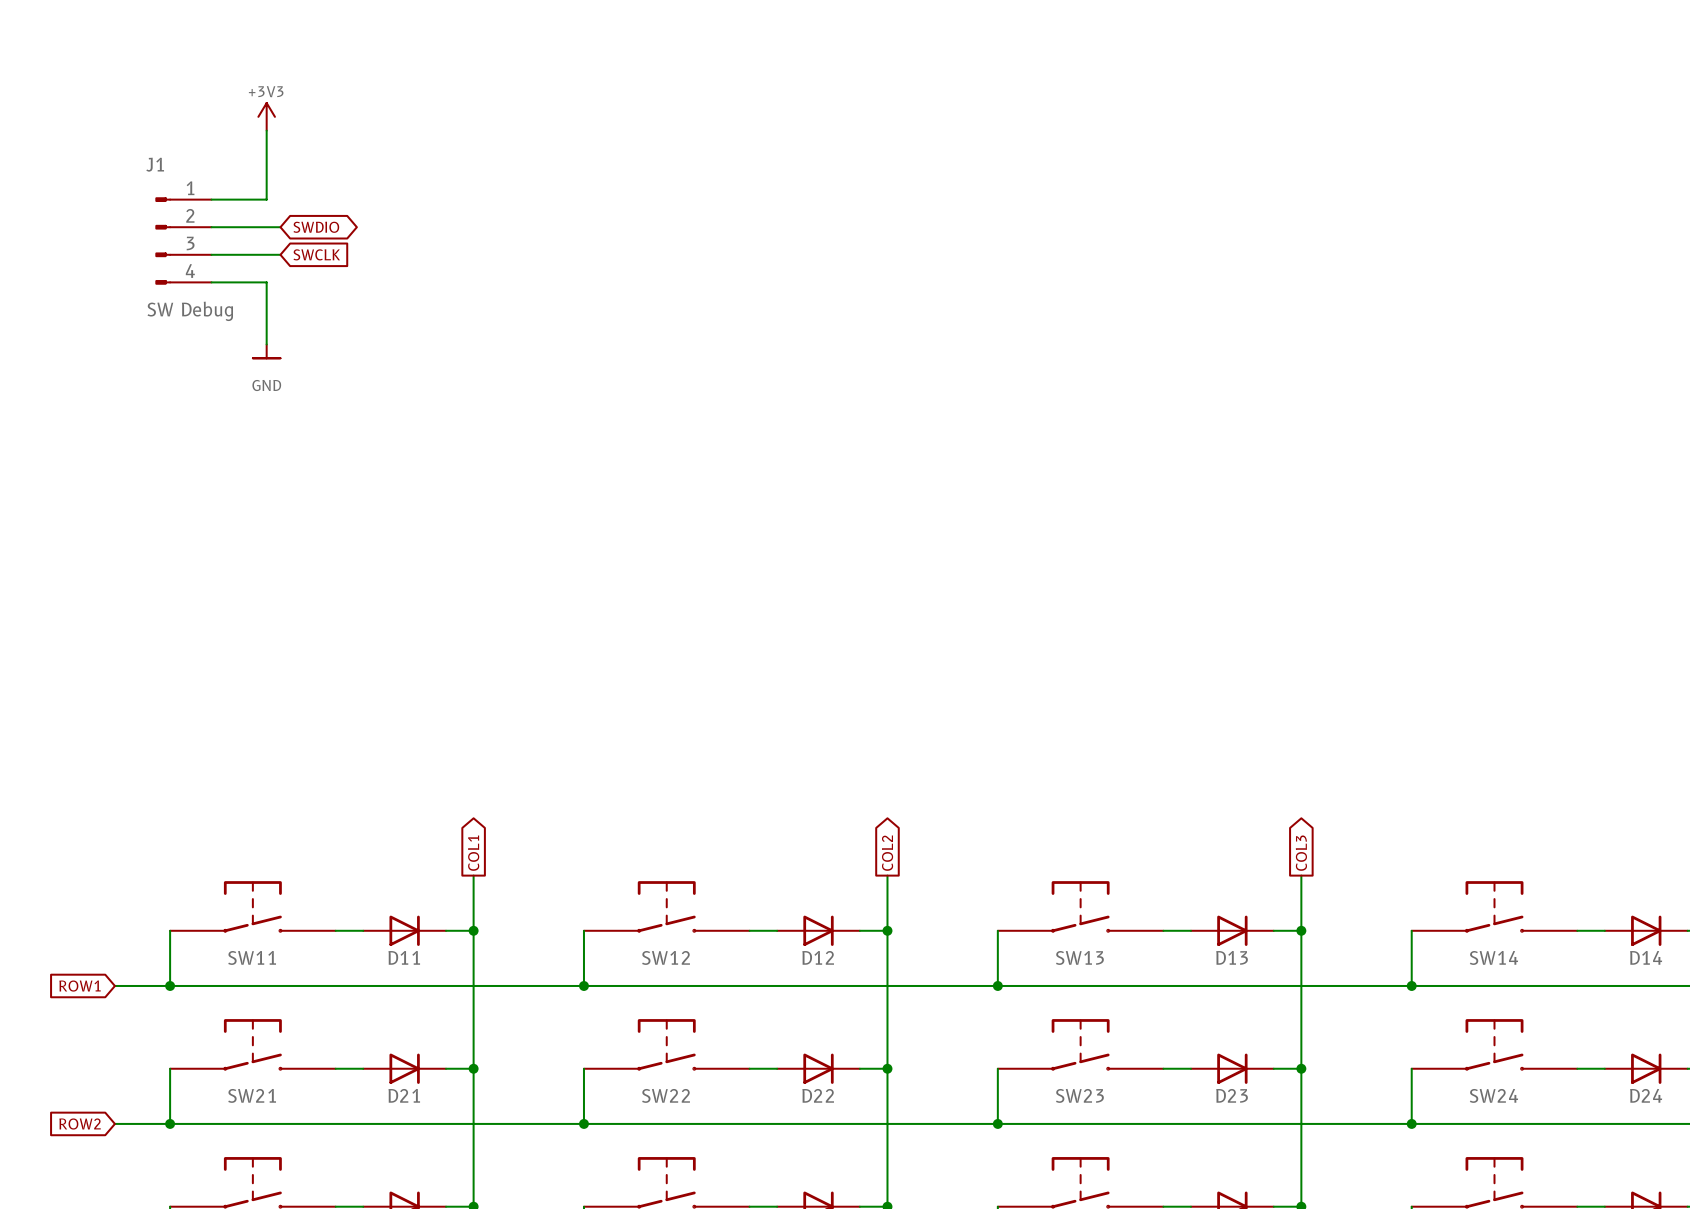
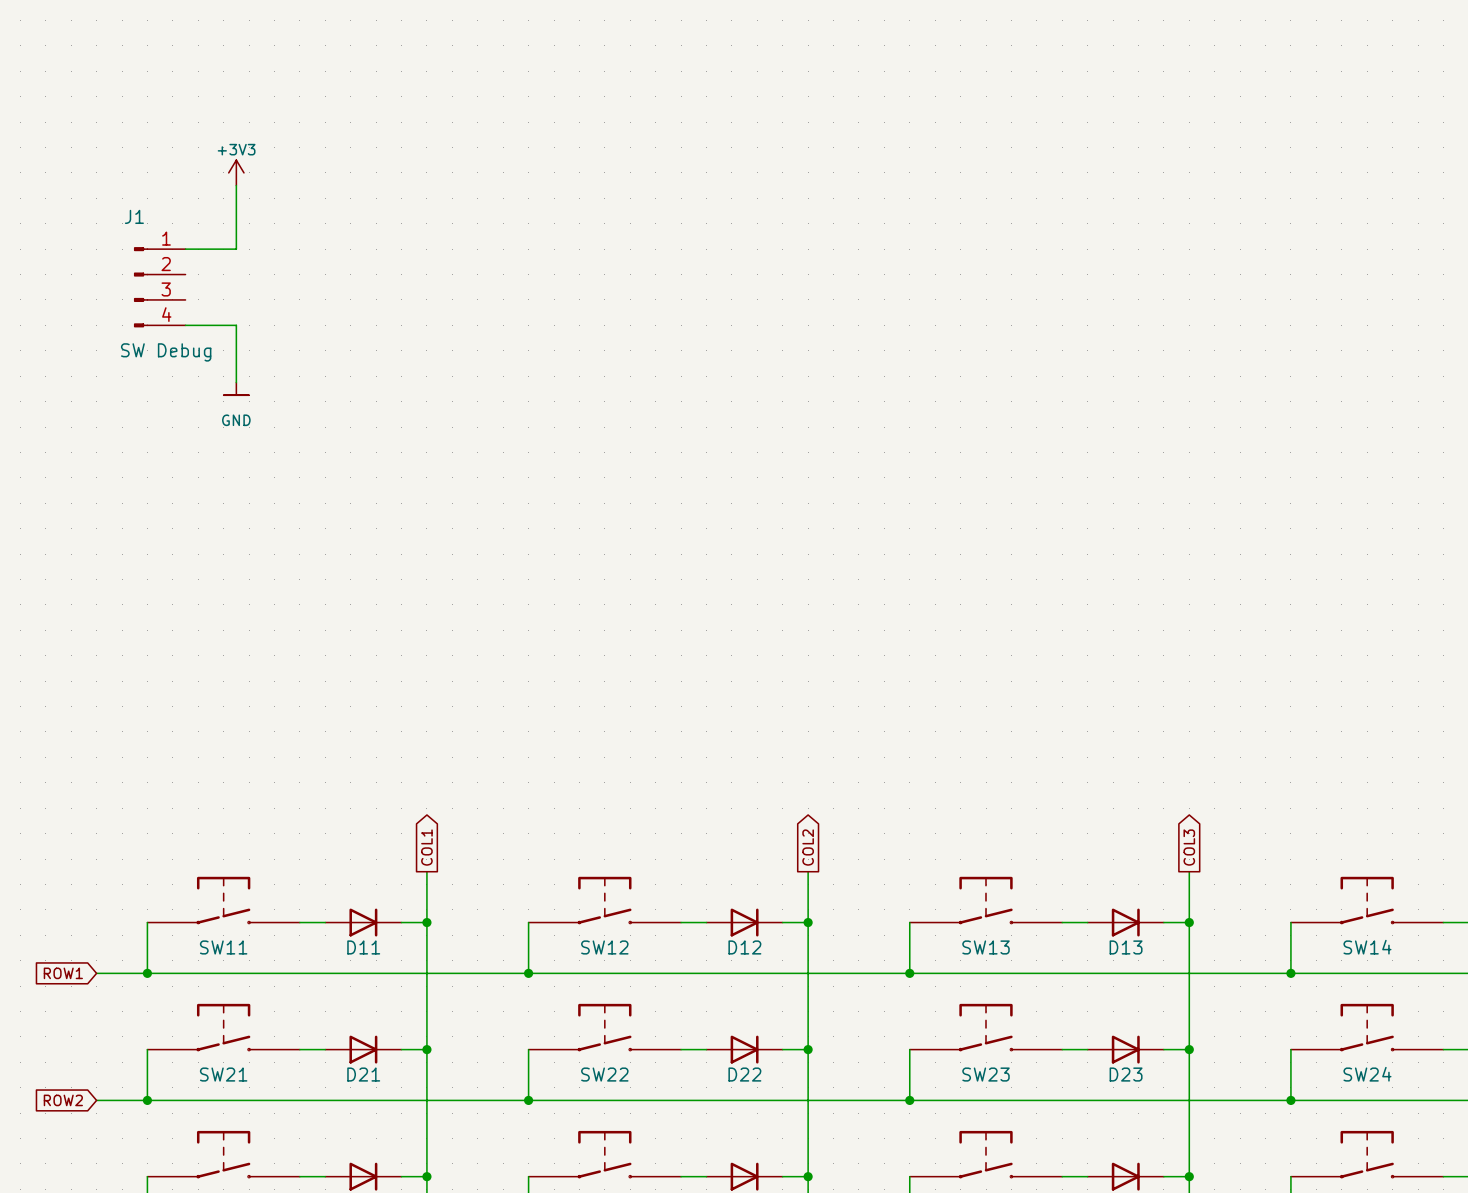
wire: (211, 227) (280, 227) -> none
global label: SWDIO (316, 227) -> none
wire: (211, 254) (280, 254) -> none
global label: SWCLK (316, 254) -> none

